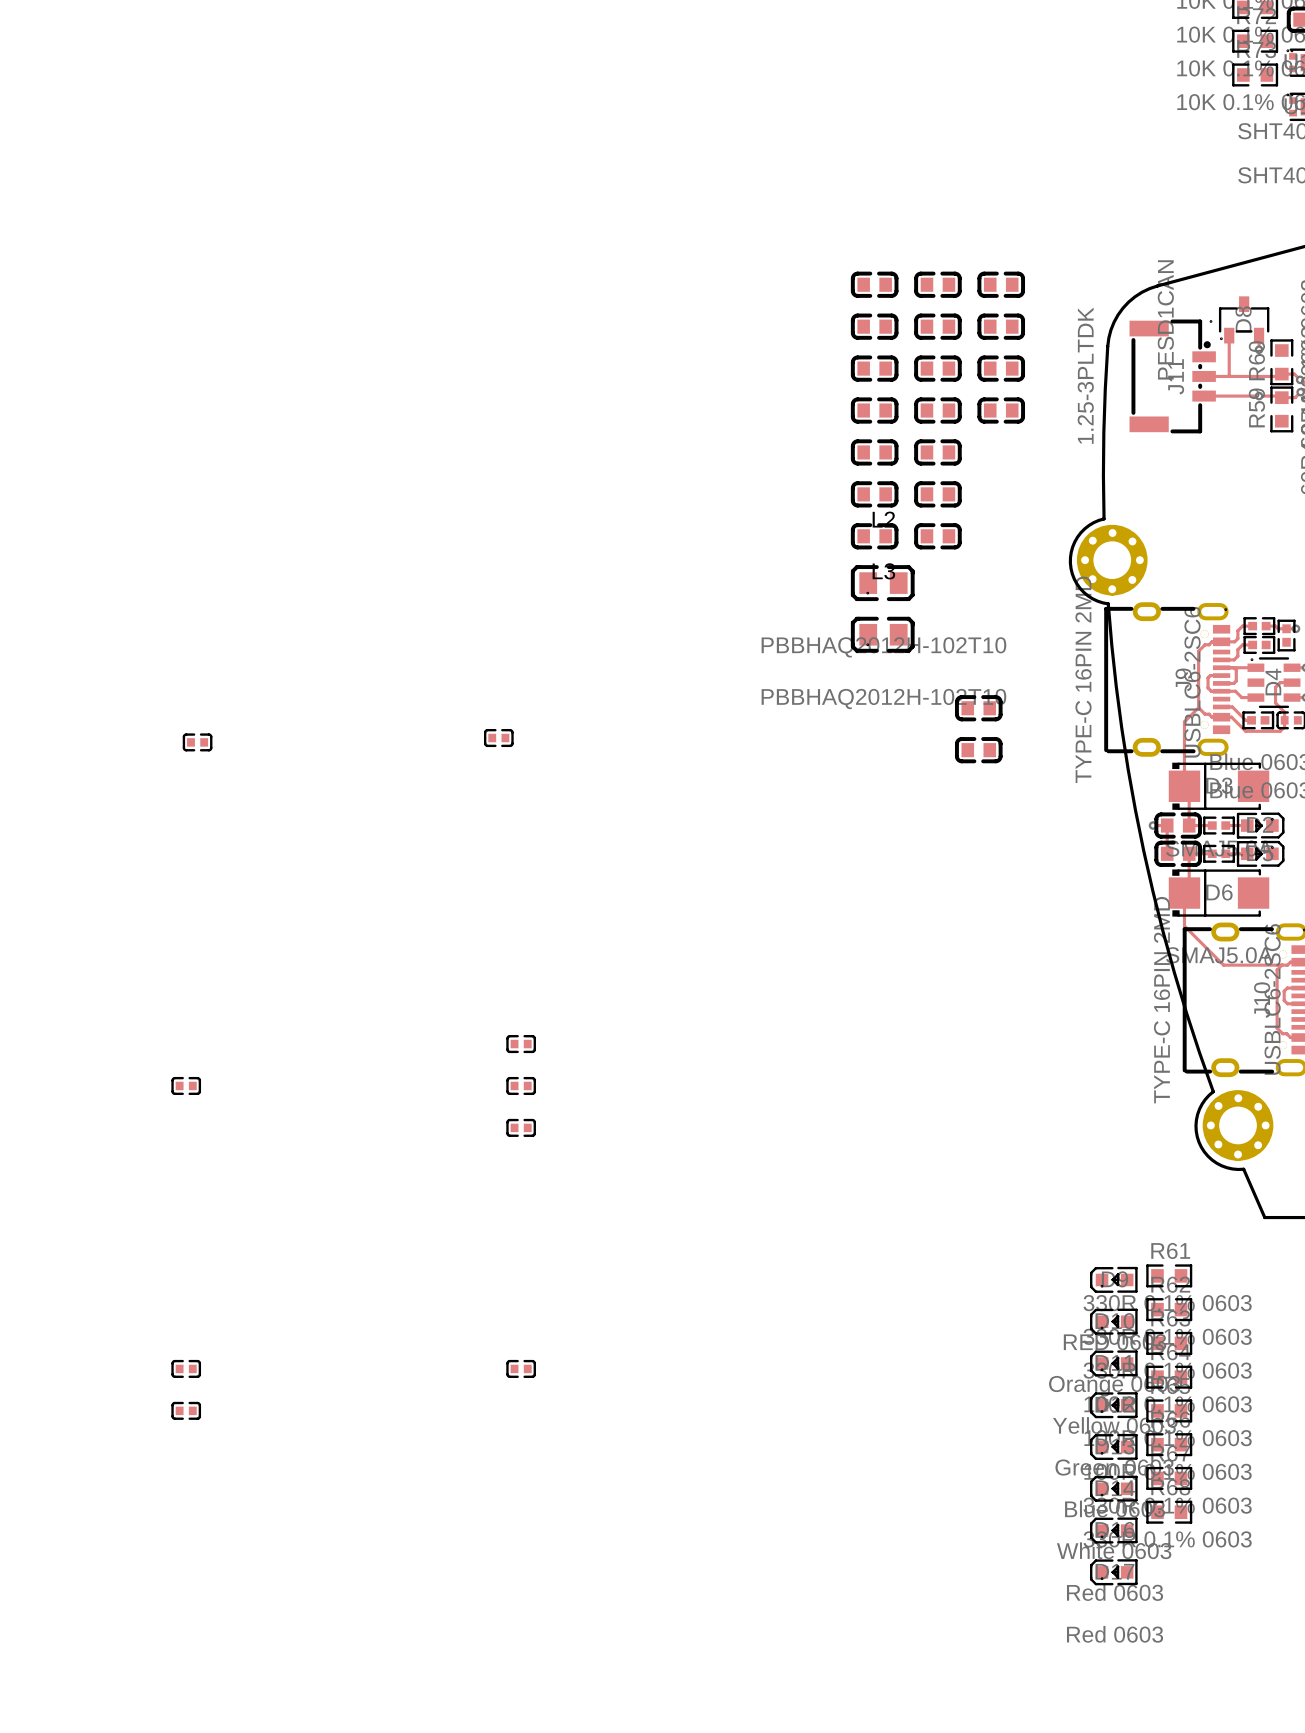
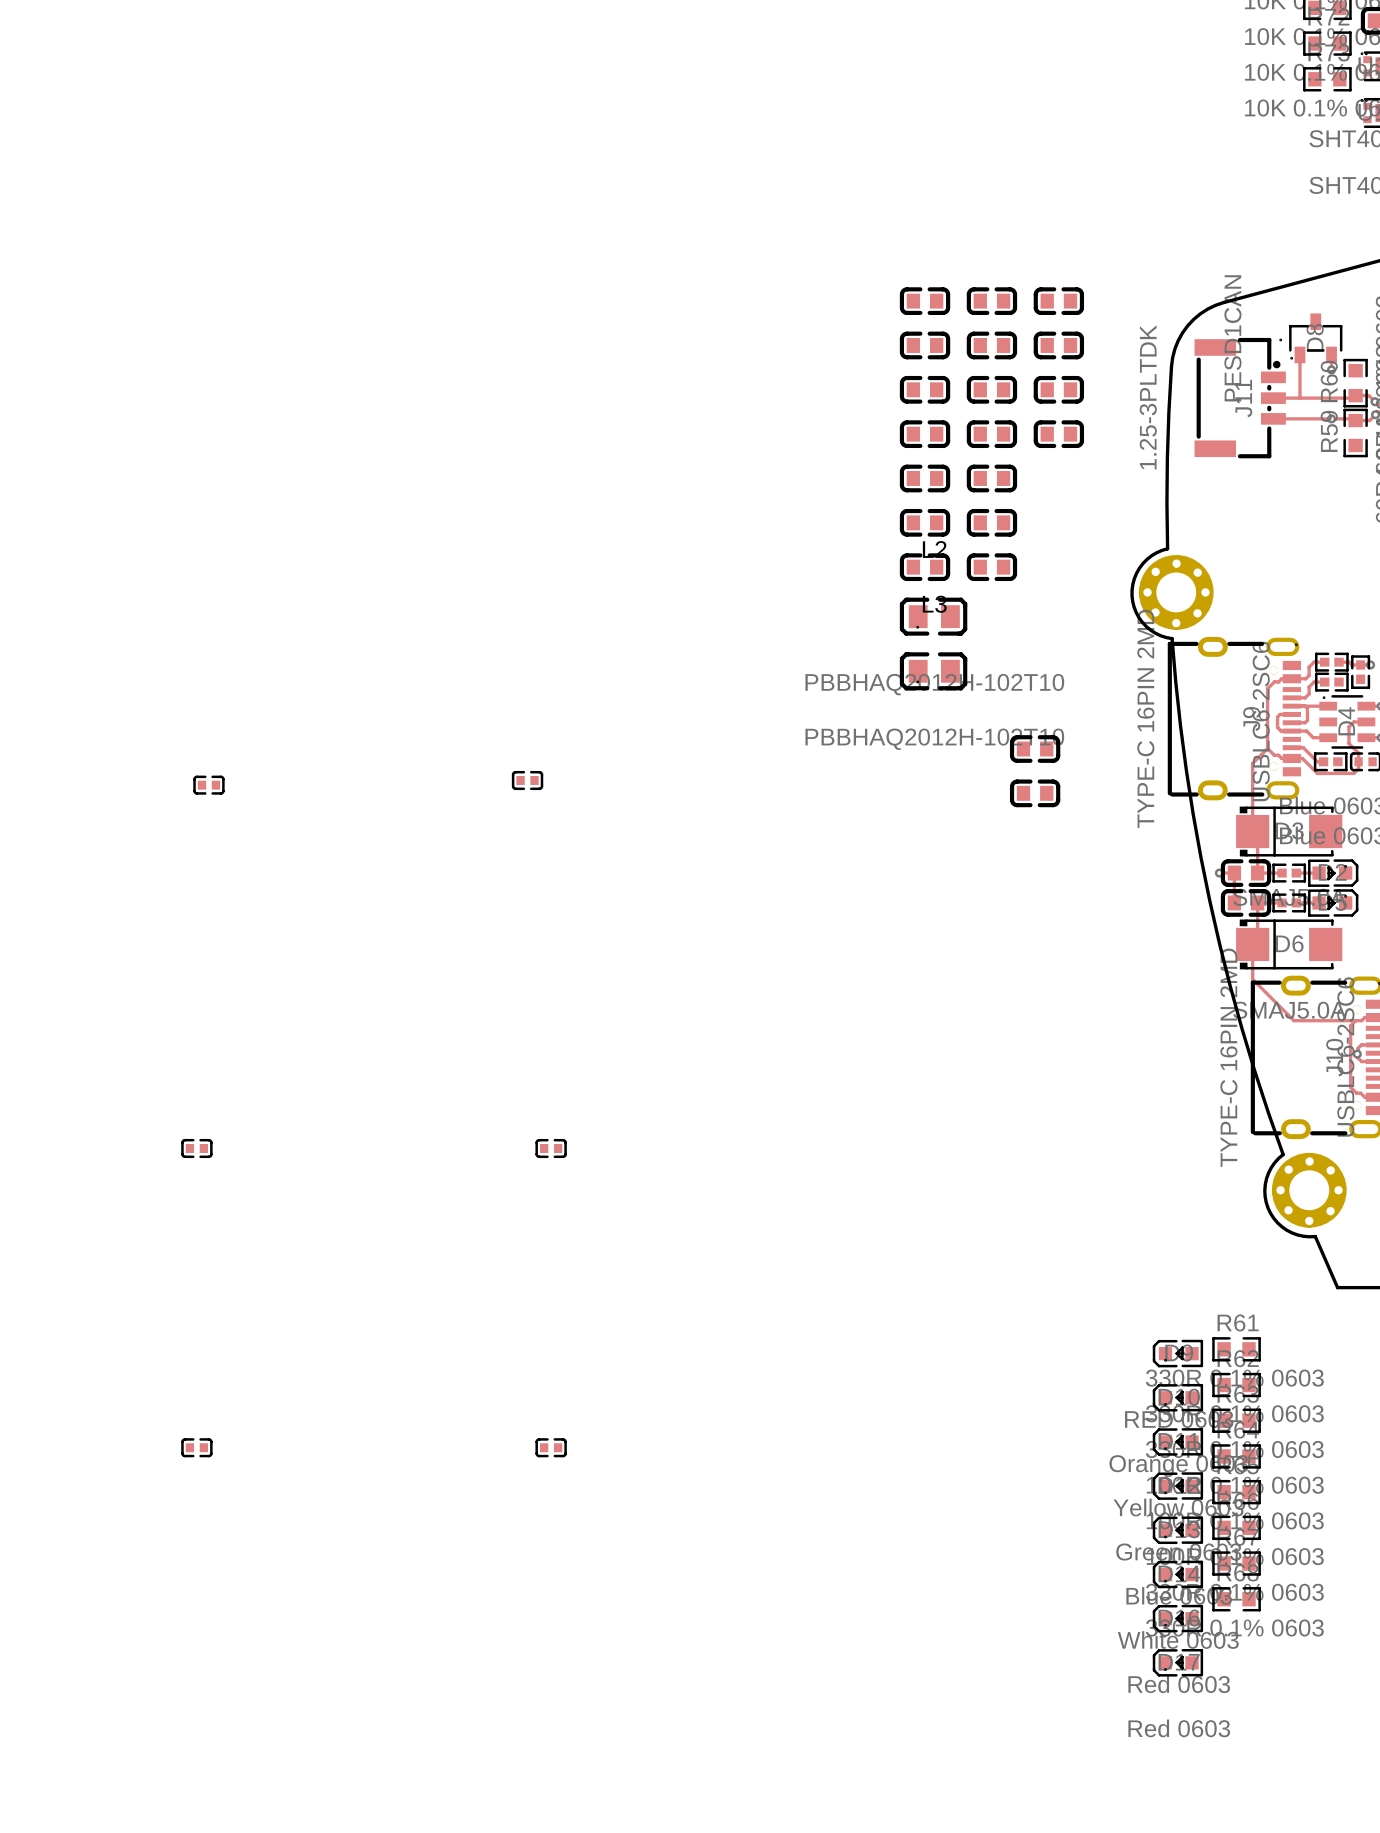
via: none -> (1357, 1054)
part: (521, 1044) -> none
part: (521, 1127) -> none
part: (186, 1410) -> none

